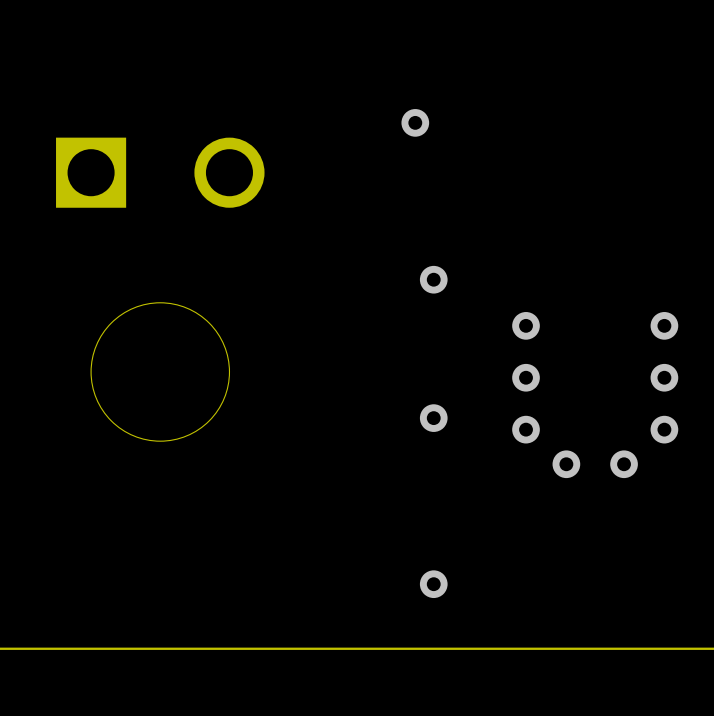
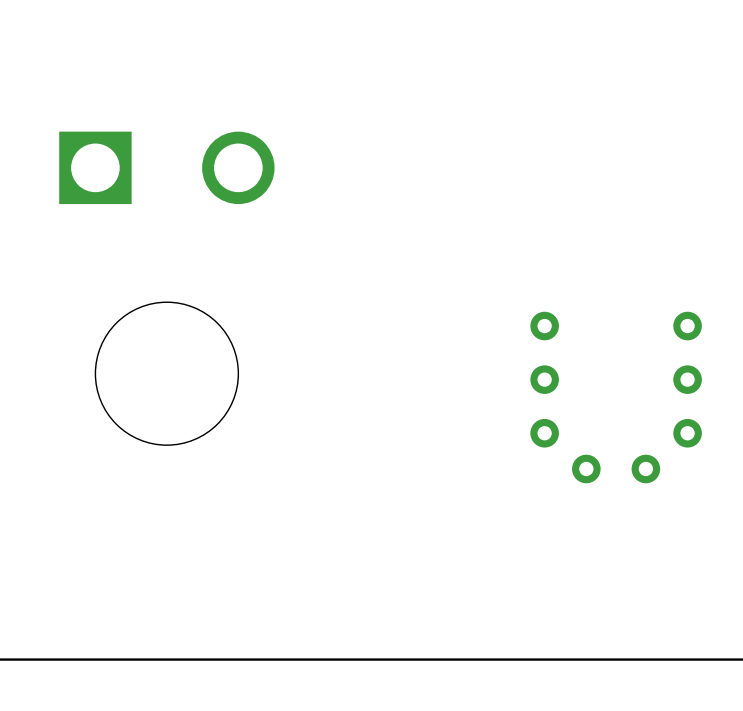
via: (415, 122) -> none
via: (433, 279) -> none
via: (433, 418) -> none
via: (433, 584) -> none

